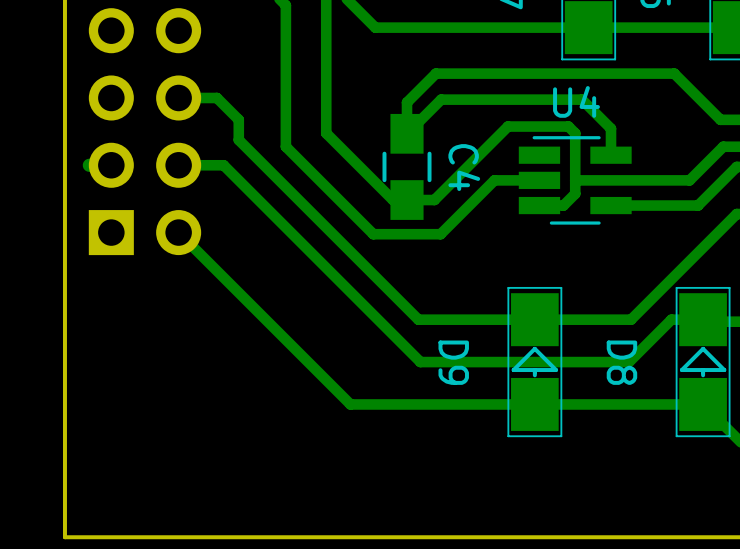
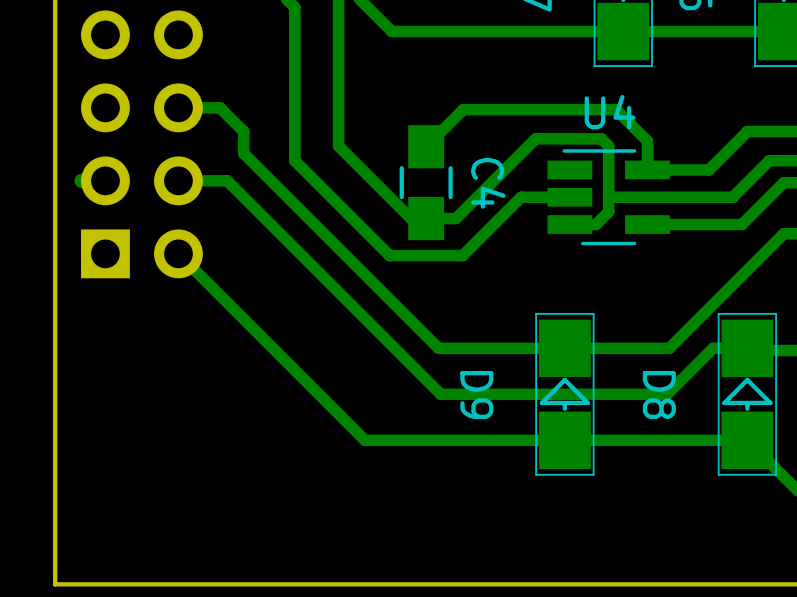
bottom track: (720, 119) (674, 73) (435, 73) (407, 102) (407, 133) -> (766, 131) (747, 131) (708, 169) (647, 169)

